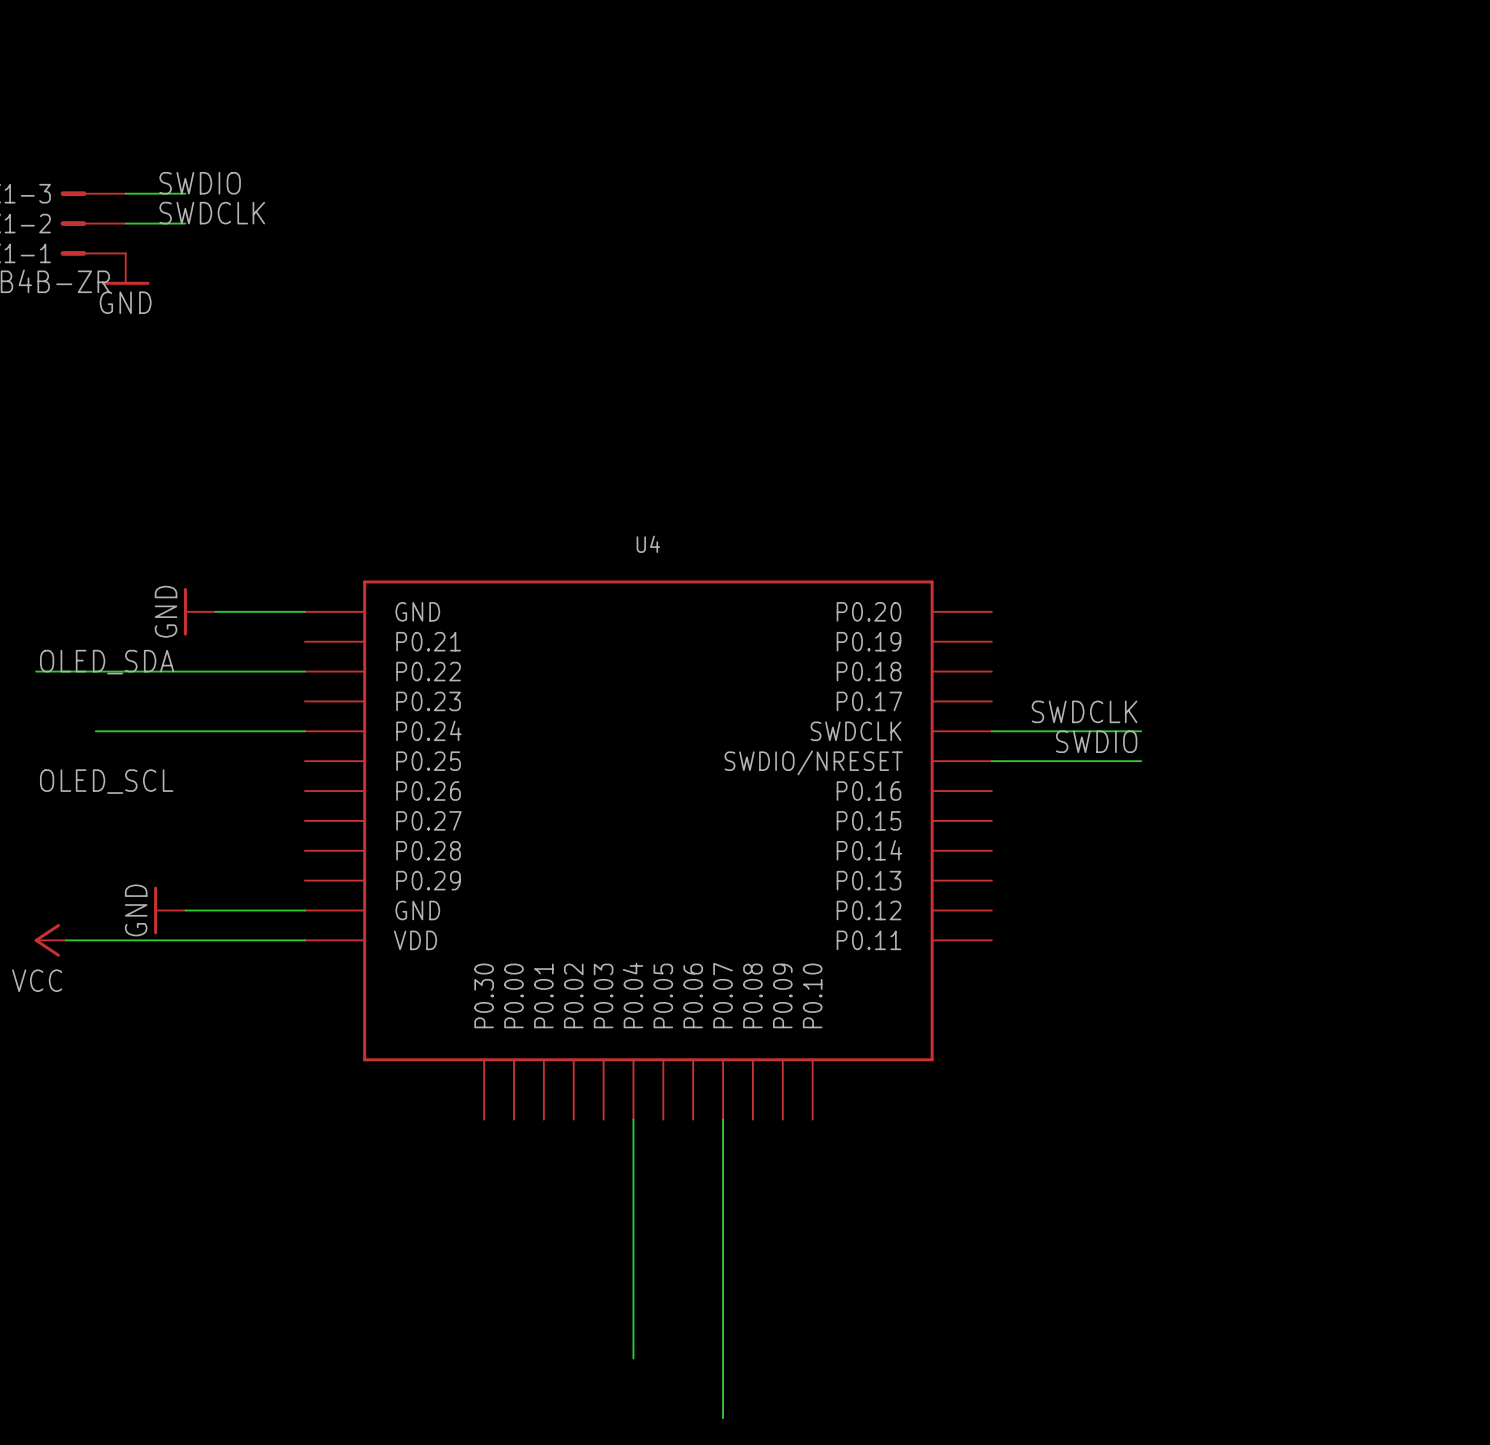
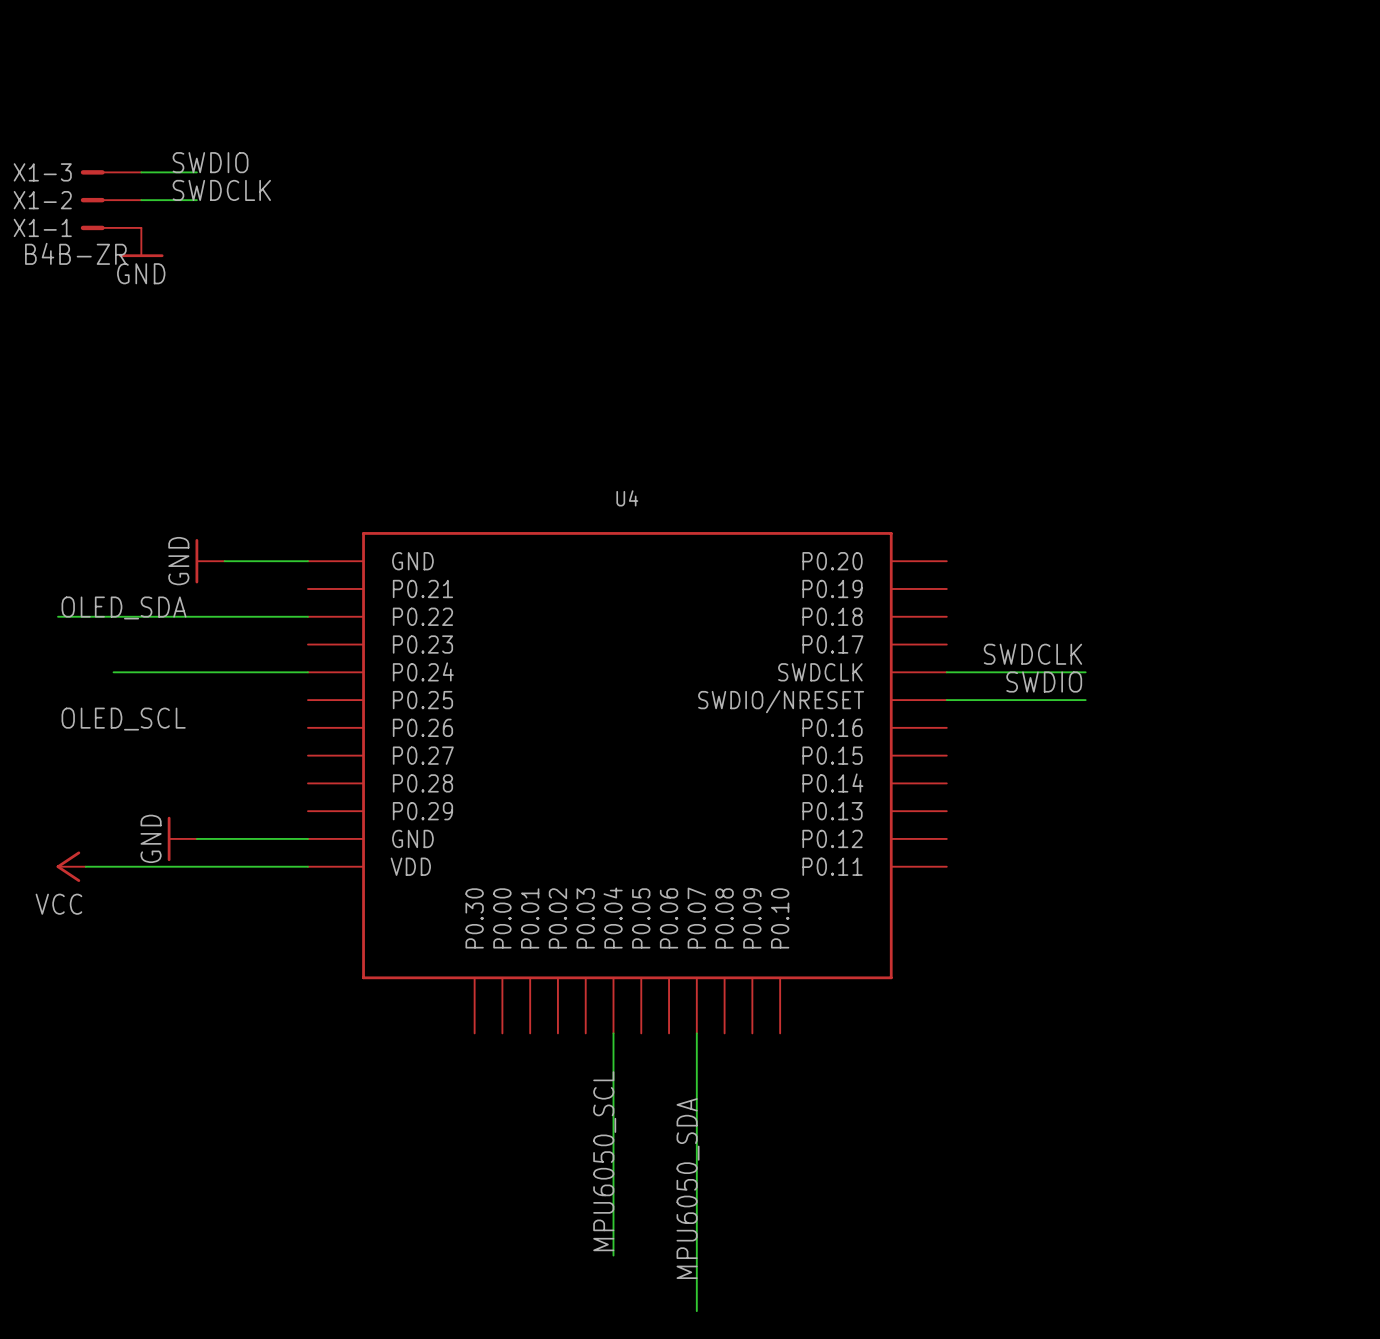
label: none -> MPU6050_SCL (604, 1161)
label: none -> MPU6050_SDA (688, 1188)

